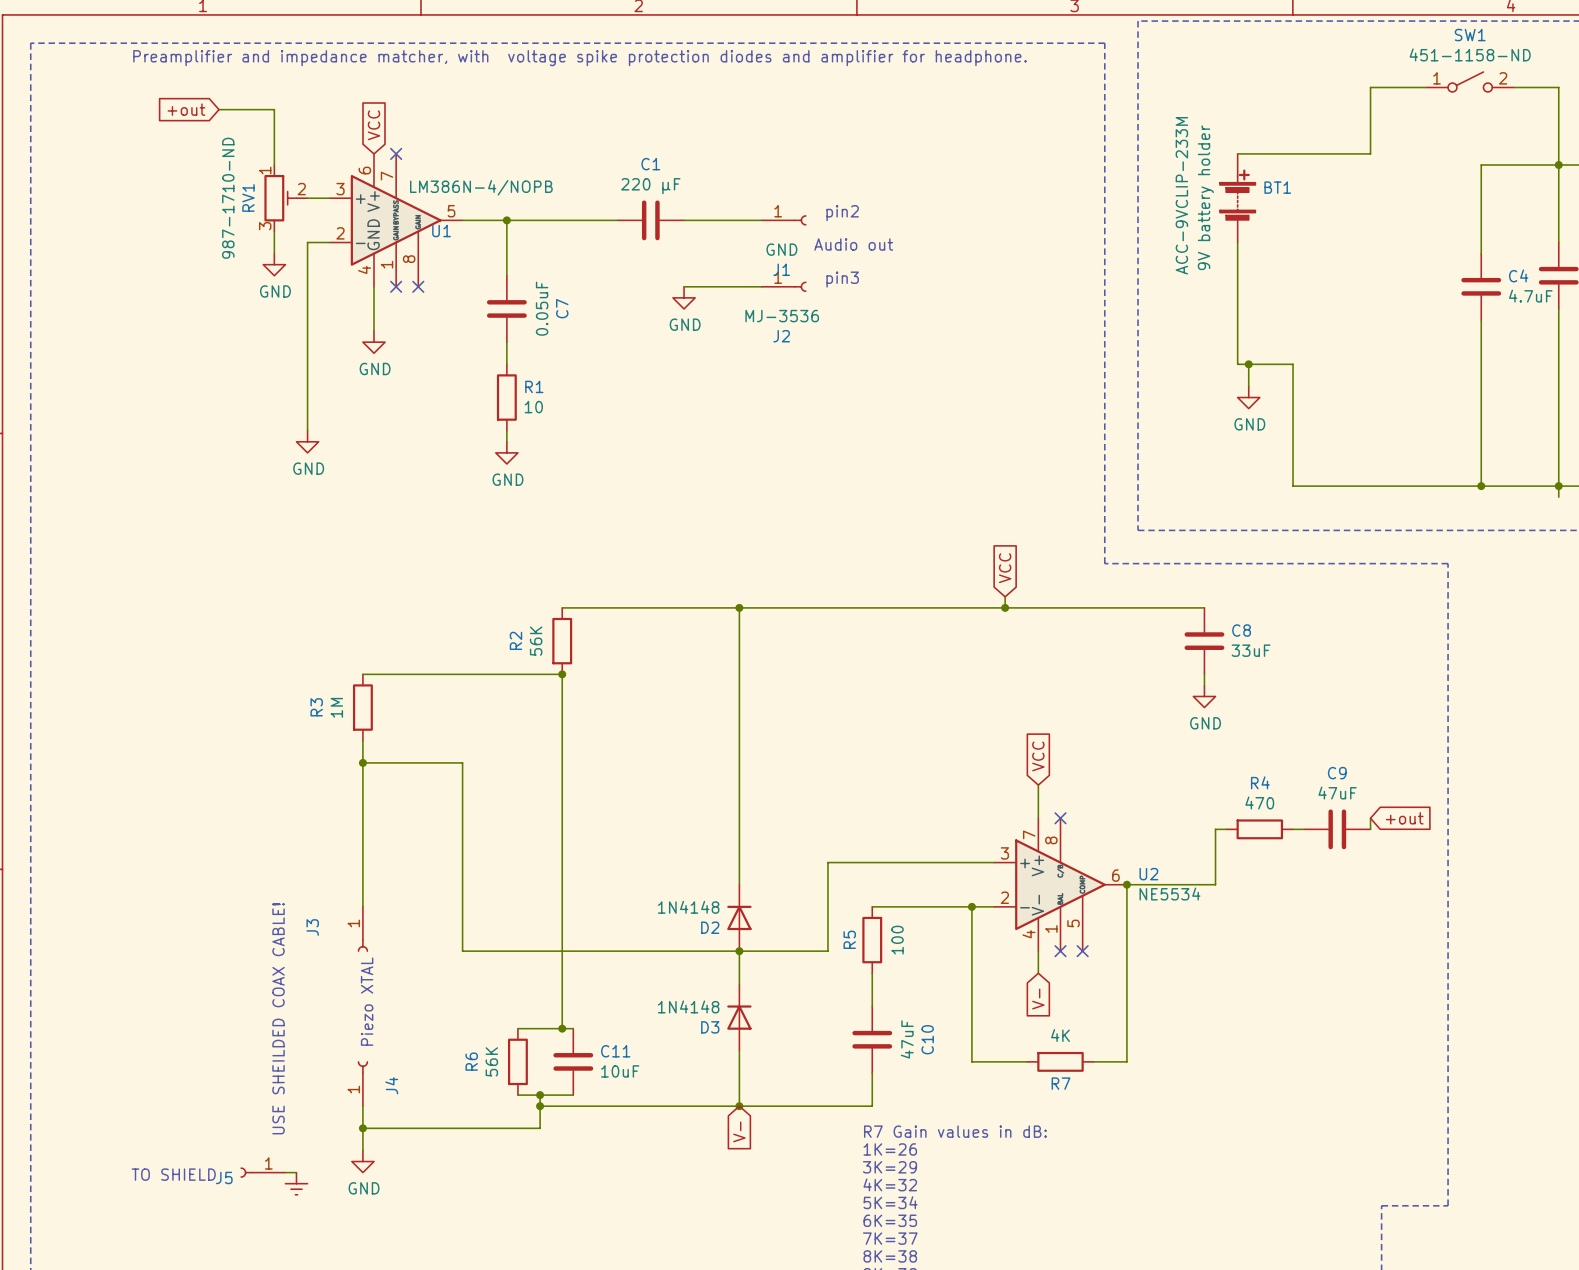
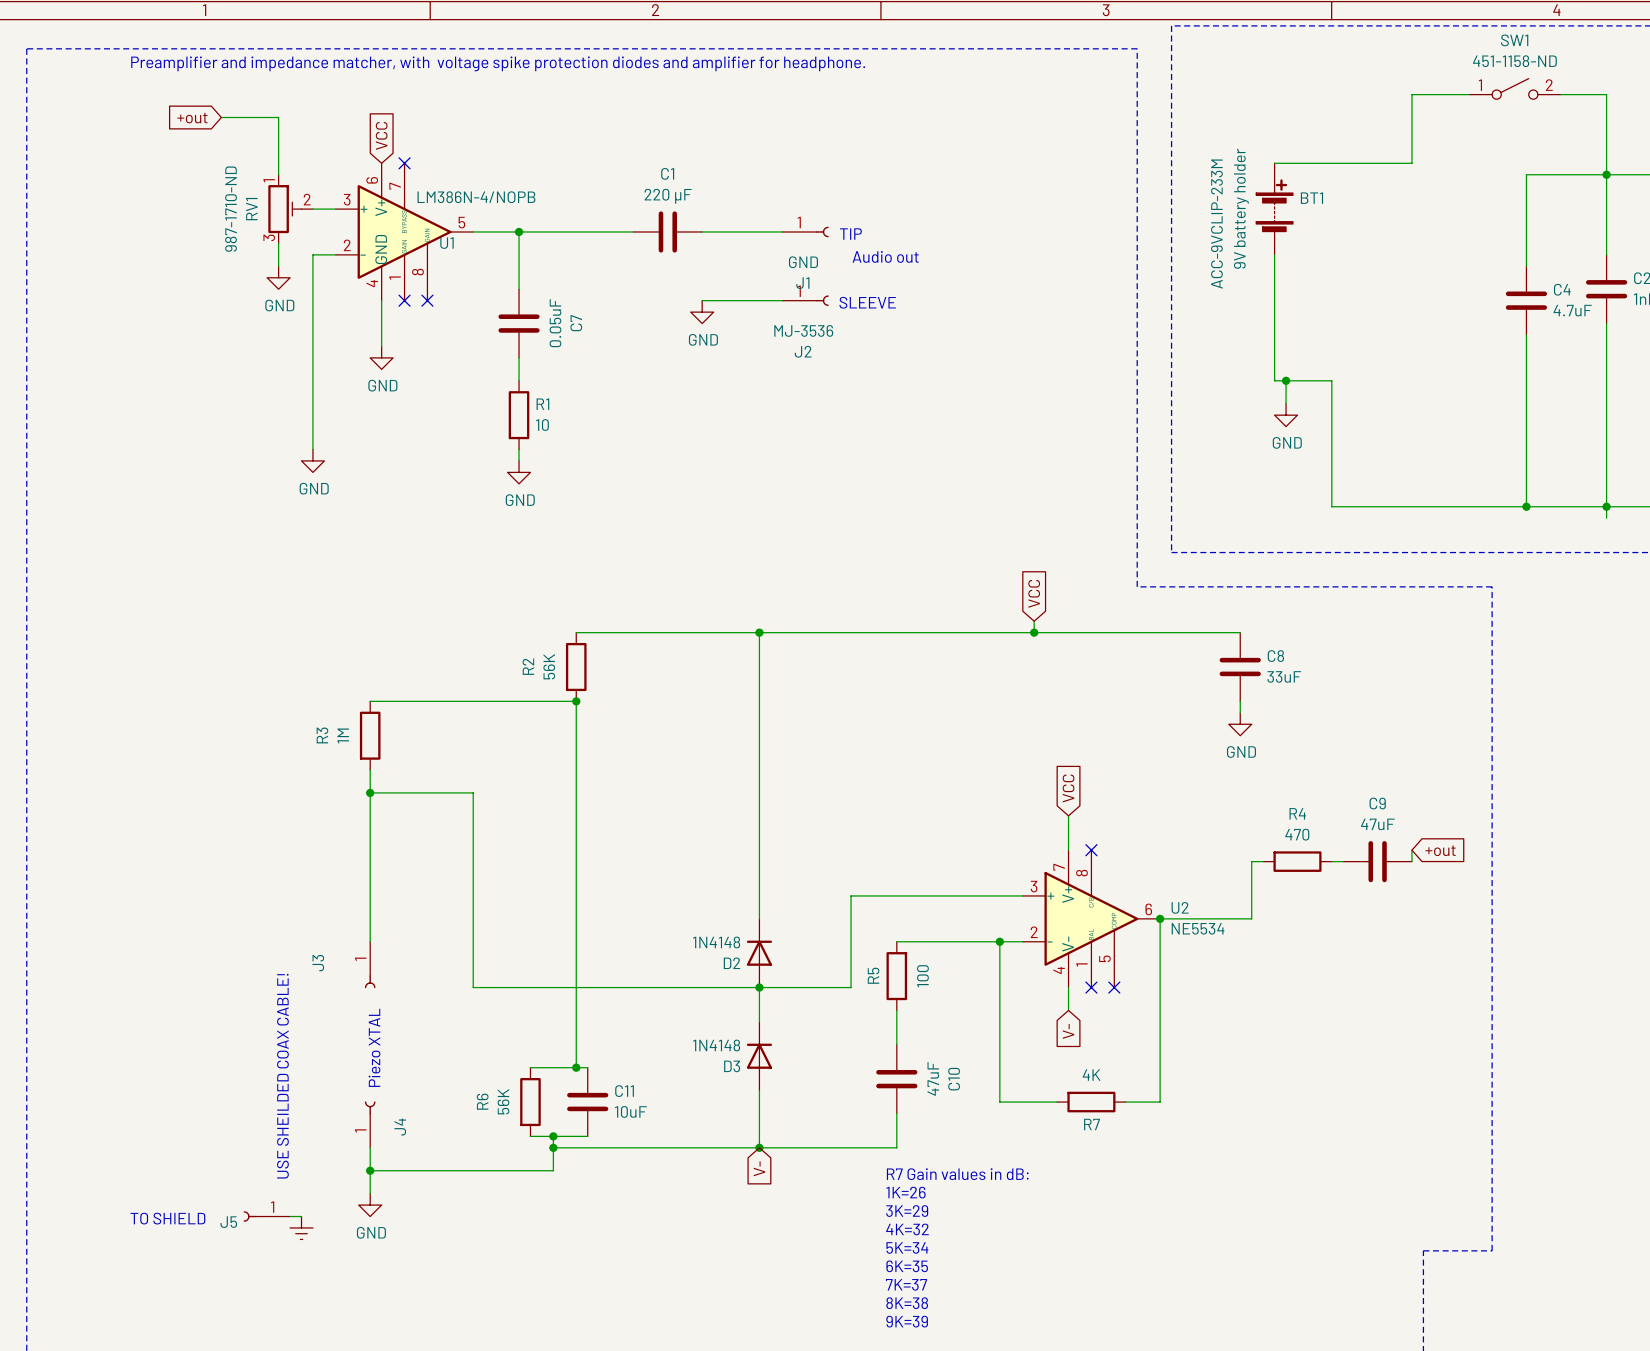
text: pin2 (842, 213) -> none
text: none -> TIP (850, 234)
text: pin3 (842, 279) -> none
text: none -> SLEEVE (867, 302)

